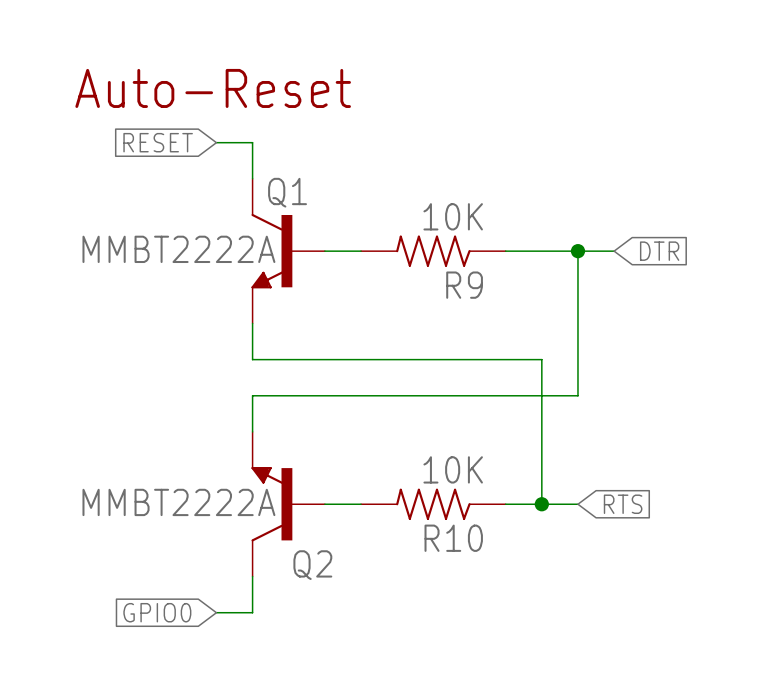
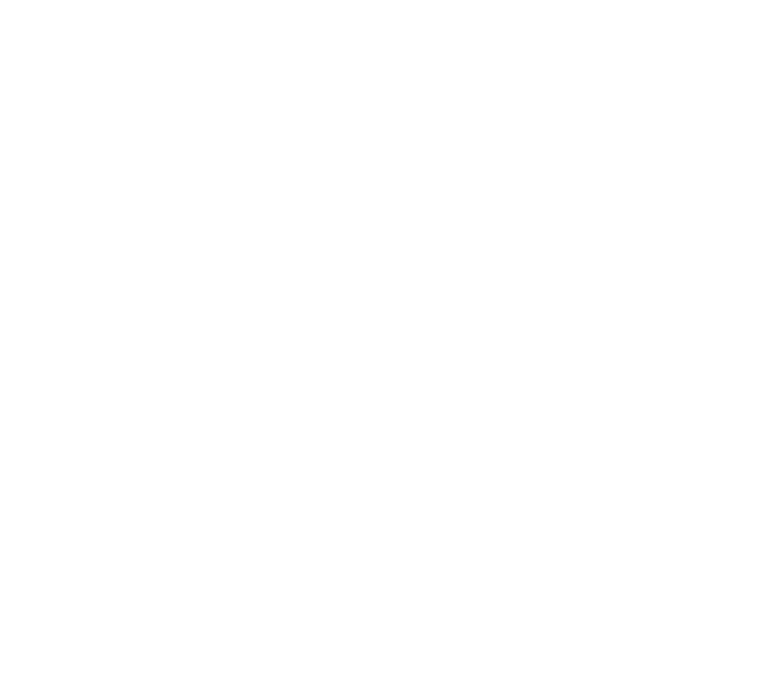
text: Auto-Reset (213, 88) -> none
global label: RESET (158, 142) -> none
wire: (216, 142) (252, 142) (252, 178) -> none
Q1: MMBT2222A (288, 251) -> none
wire: (324, 251) (361, 251) -> none
R9: 10K (433, 251) -> none
wire: (505, 251) (614, 251) -> none
wire: (577, 251) (577, 395) (252, 395) (252, 431) -> none
junction: (577, 251) -> none
global label: DTR (659, 251) -> none
wire: (252, 323) (252, 359) (541, 359) (541, 504) -> none
Q2: MMBT2222A (288, 504) -> none
wire: (324, 504) (361, 504) -> none
R10: 10K (433, 504) -> none
wire: (505, 504) (577, 504) -> none
junction: (541, 504) -> none
global label: RTS (623, 504) -> none
wire: (252, 576) (252, 612) (216, 612) -> none
global label: GPIO0 (157, 612) -> none

